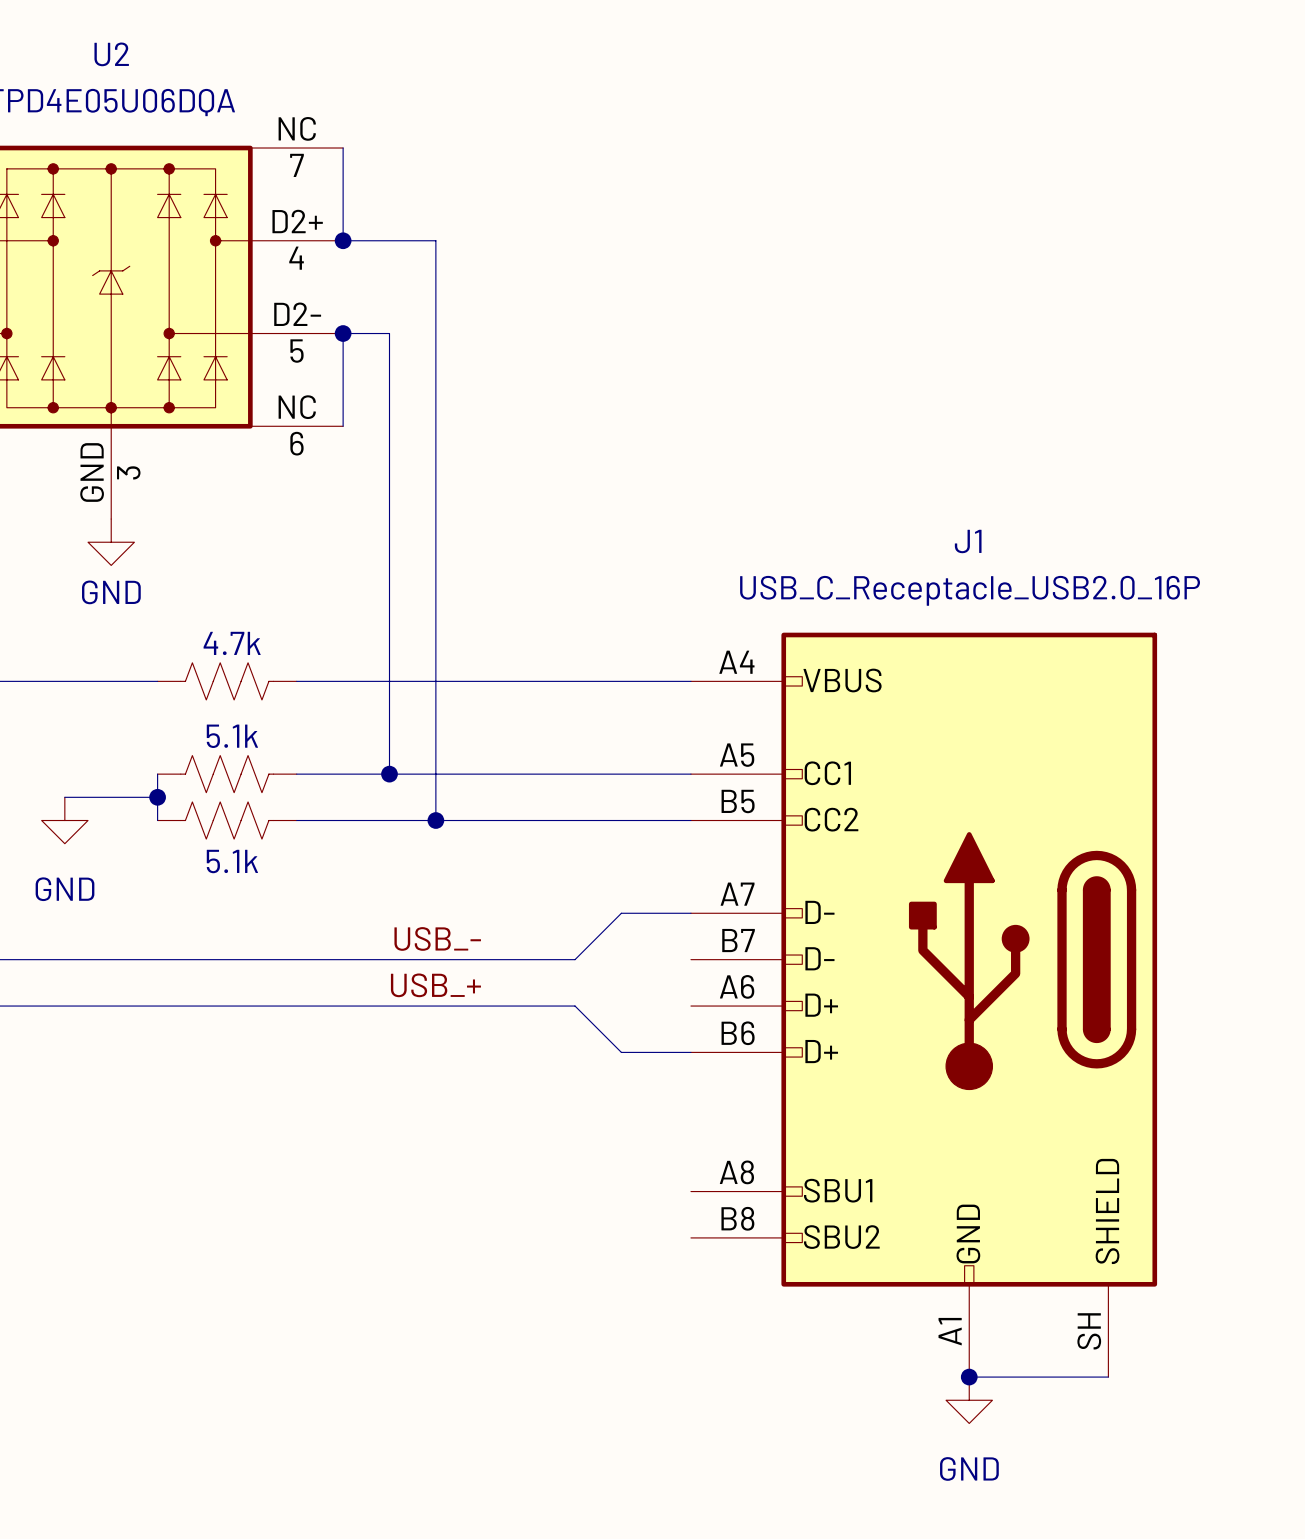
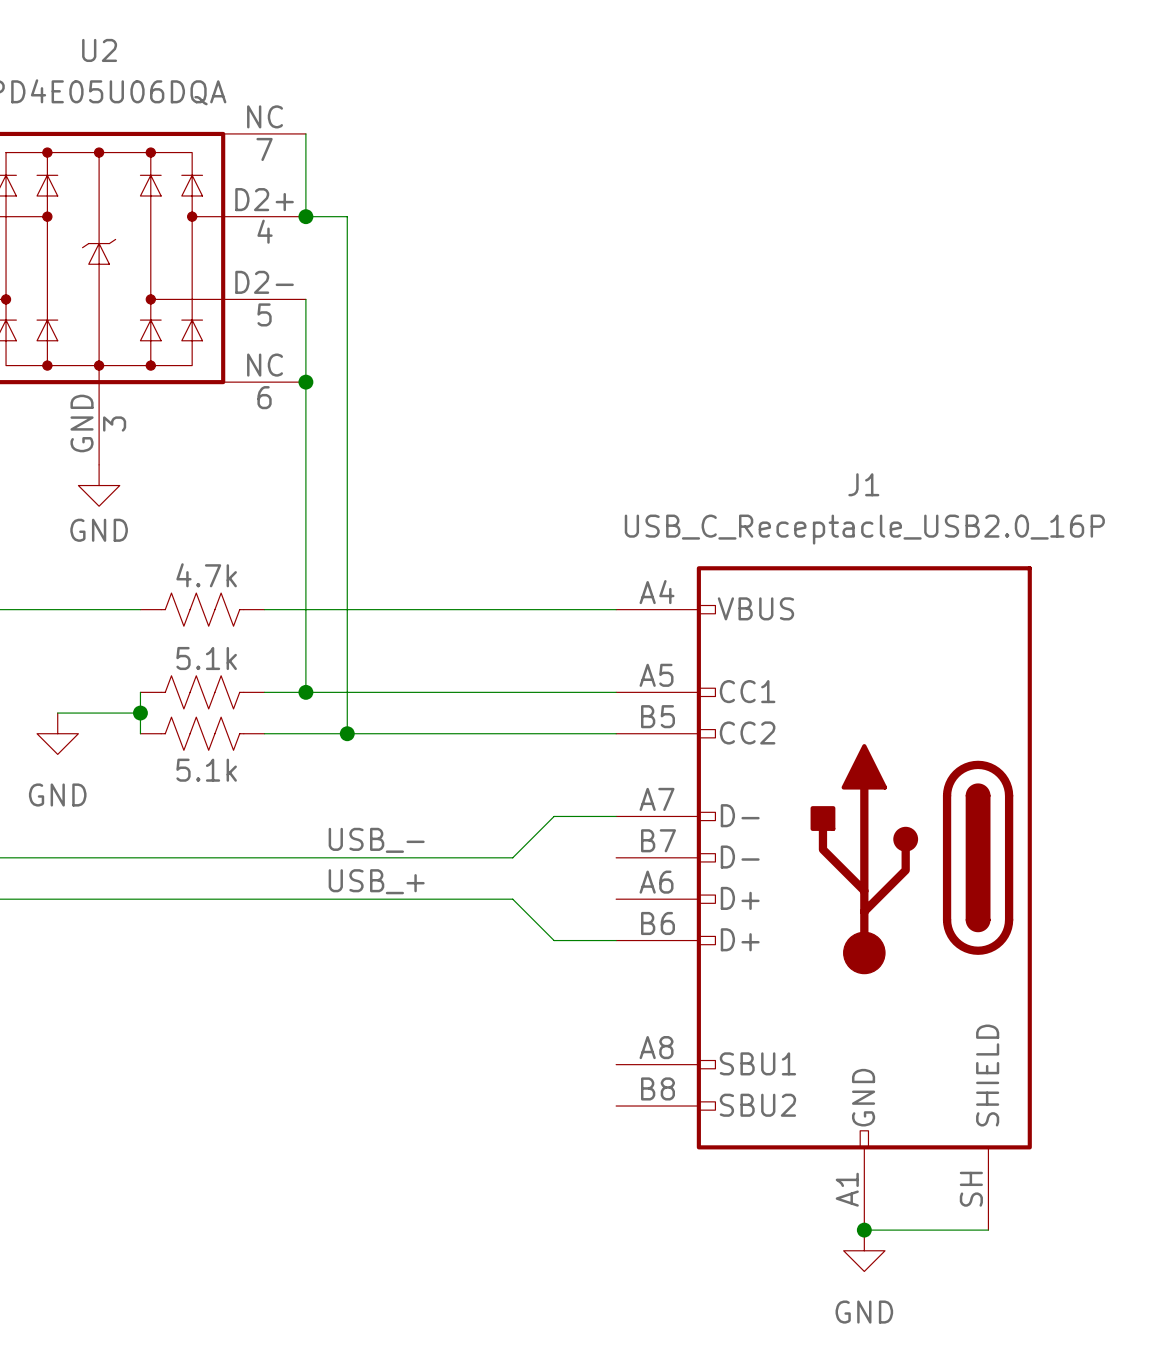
wire: (389, 240) (435, 240) (435, 820) -> none
wire: (343, 333) (389, 333) -> (347, 216) (347, 299)
junction position: (343, 333) -> (305, 382)
wire: none -> (305, 382) (305, 692)
junction: none -> (305, 692)
wire: none -> (347, 692) (347, 733)
junction: (389, 774) -> none
junction: none -> (347, 733)
junction: (435, 820) -> none

